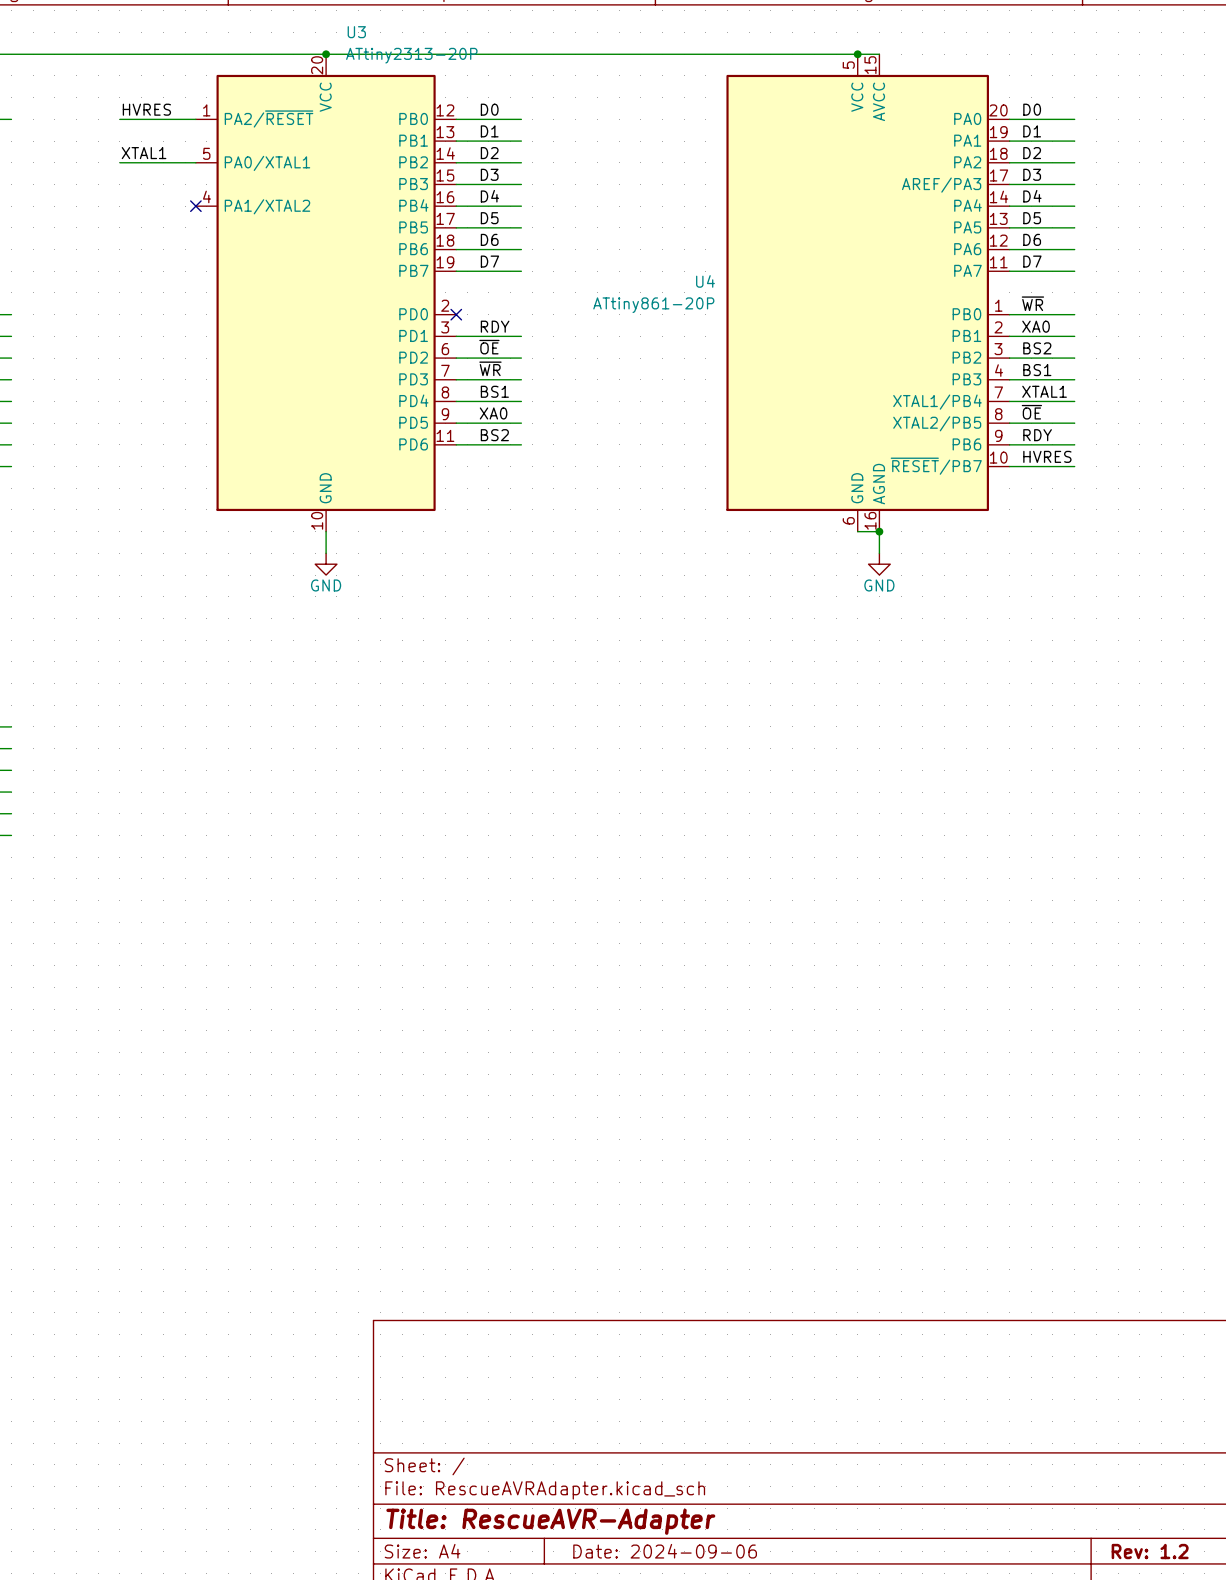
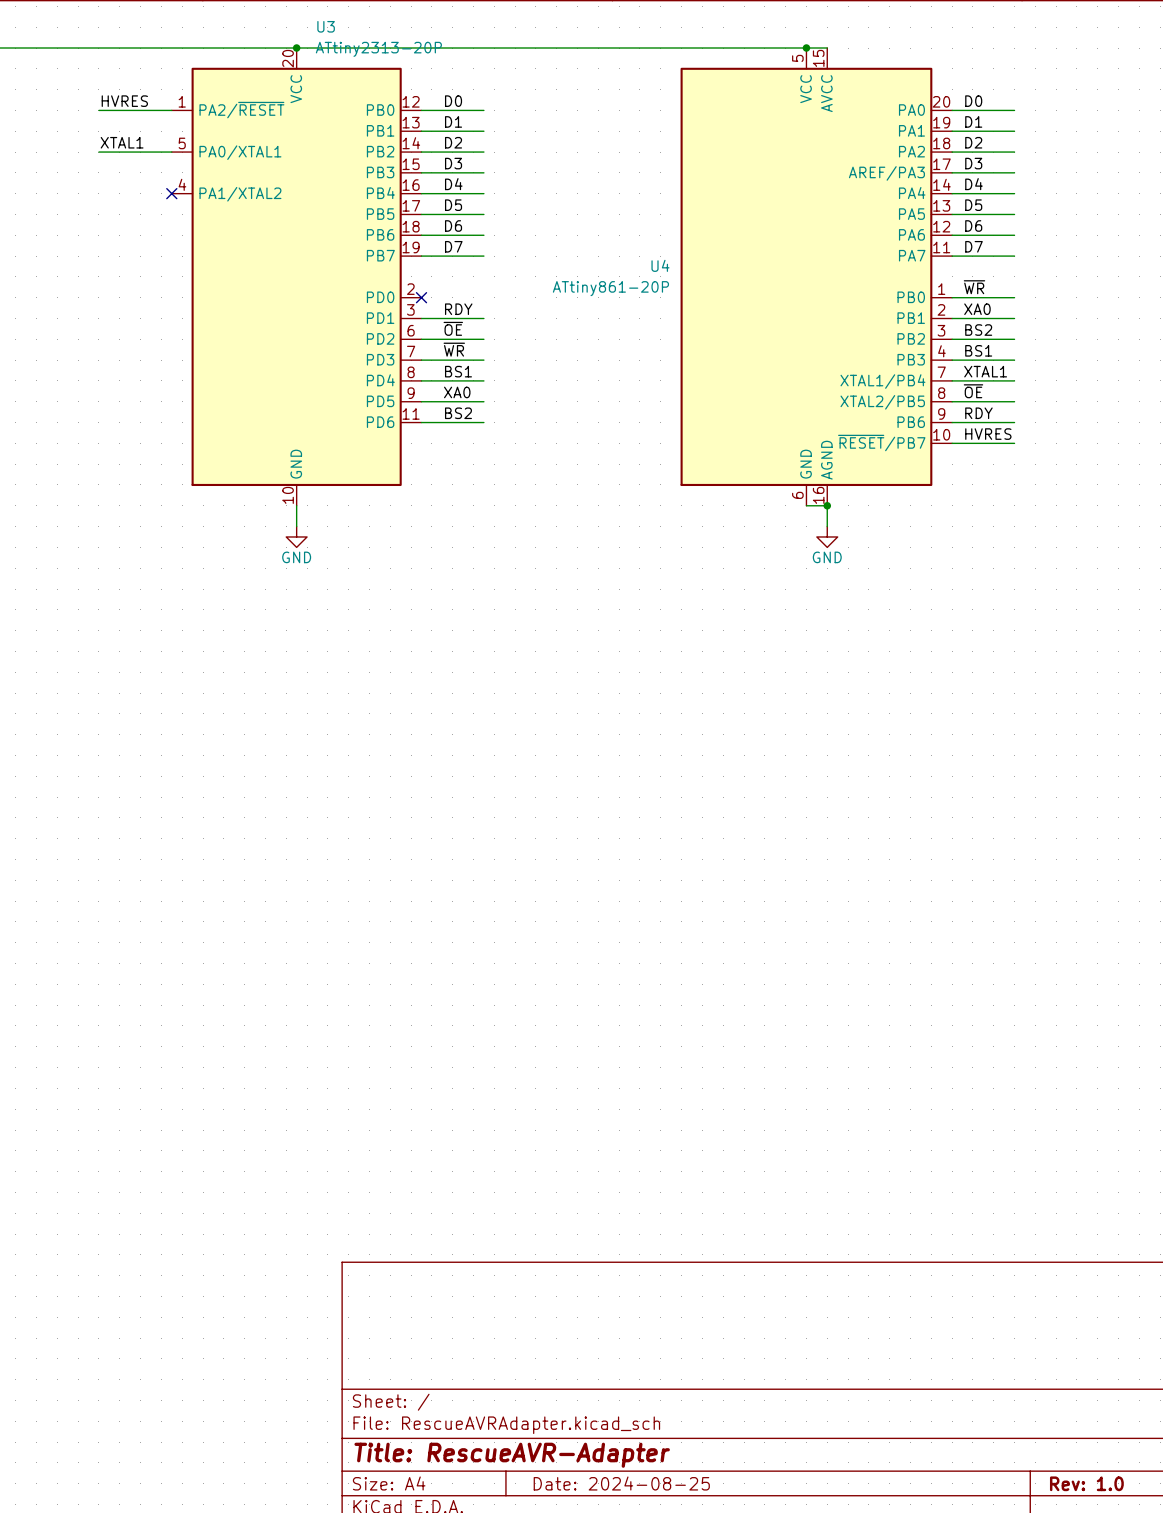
title block: Date: 2024-09-06 (665, 1551) -> Date: 2024-08-25 (621, 1483)
title block: Rev: 1.2 (1150, 1551) -> Rev: 1.0 (1086, 1483)

